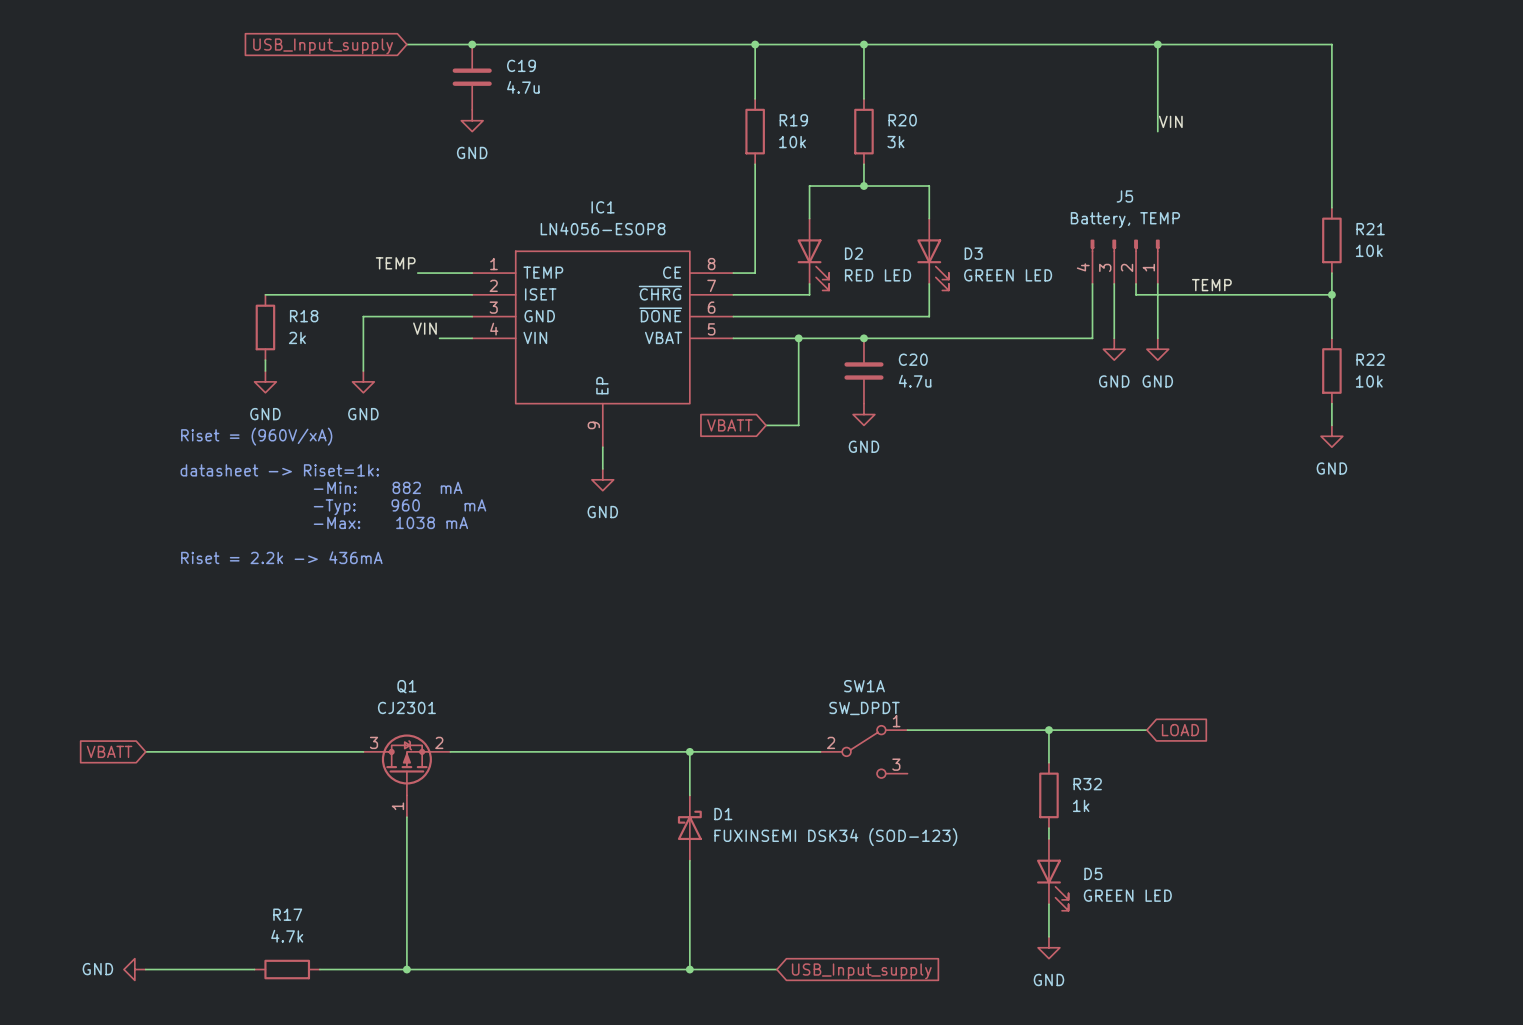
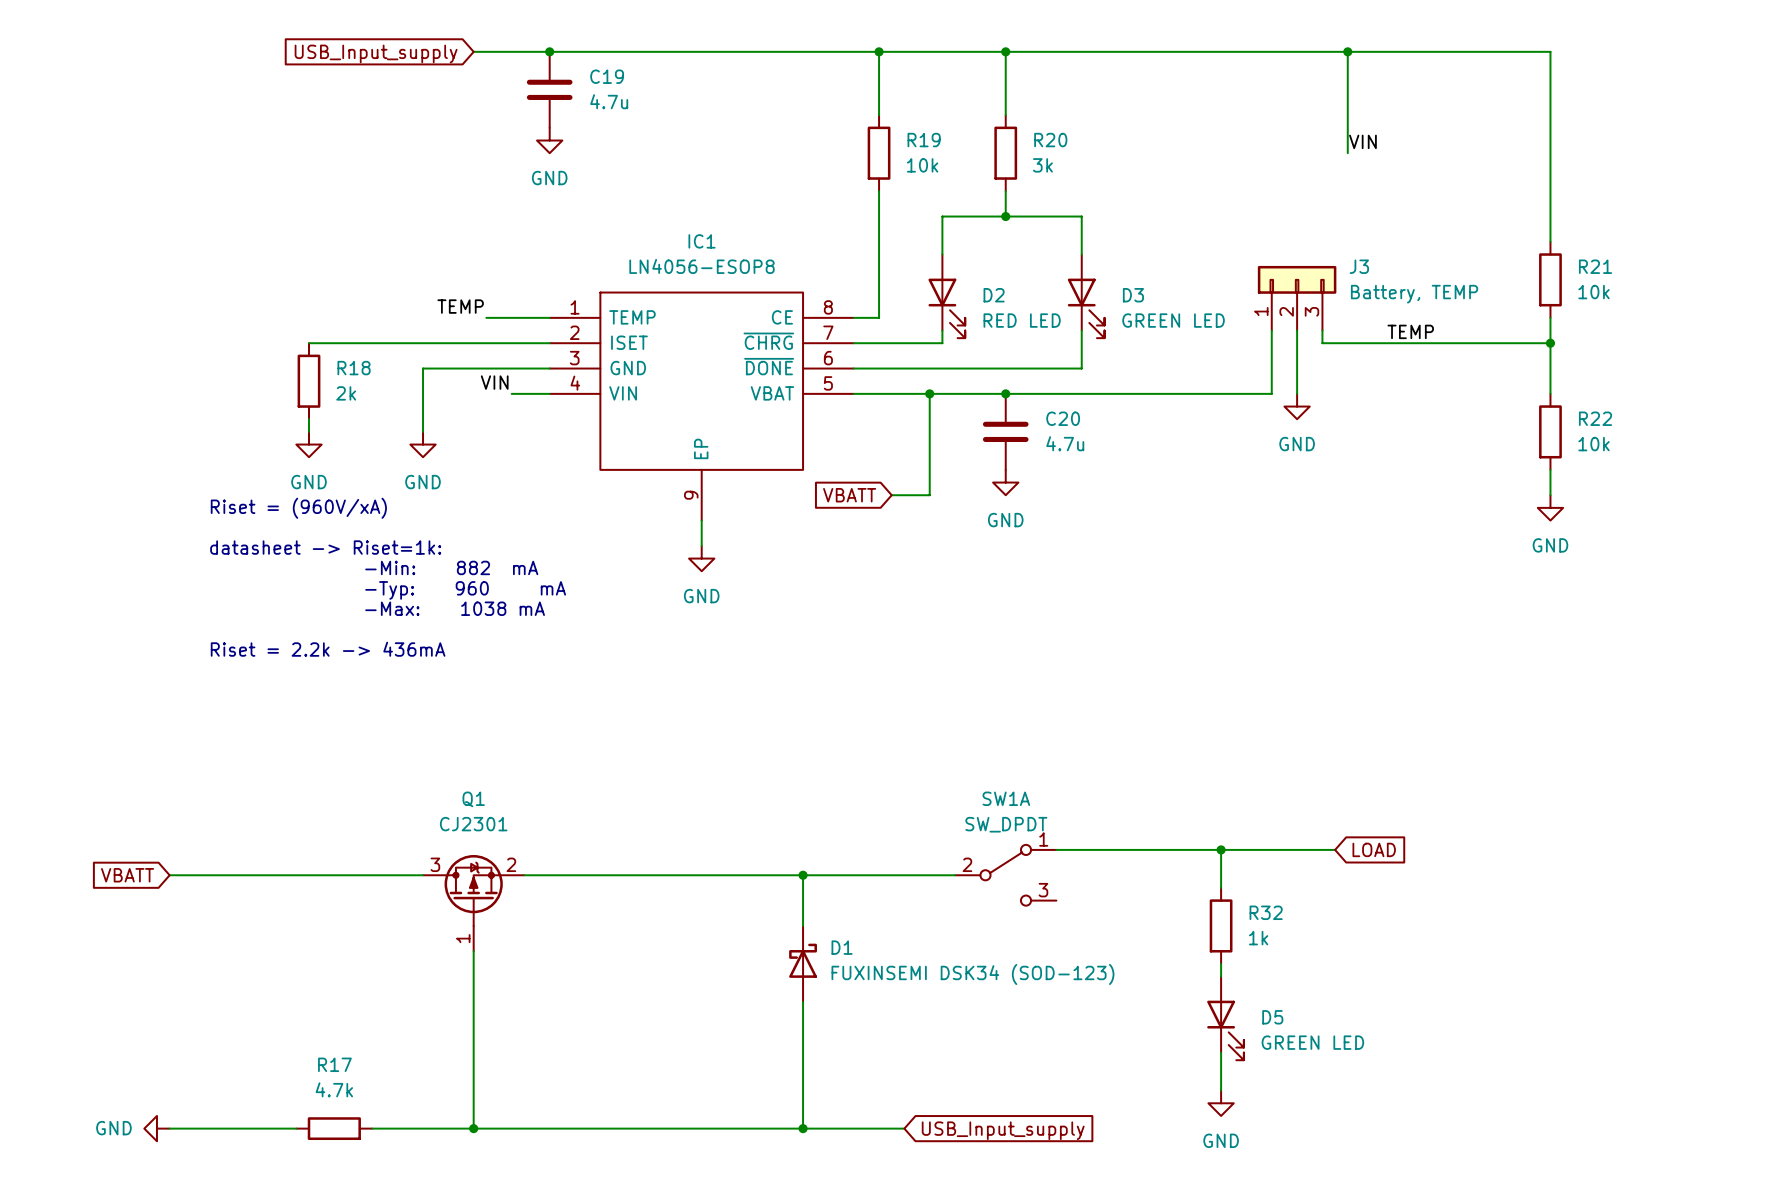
J3: none -> Battery, TEMP (1297, 298)
J5: Battery, TEMP (1125, 261) -> none
wire: (1157, 283) (1157, 338) -> none
power symbol: GND (1157, 349) -> none

